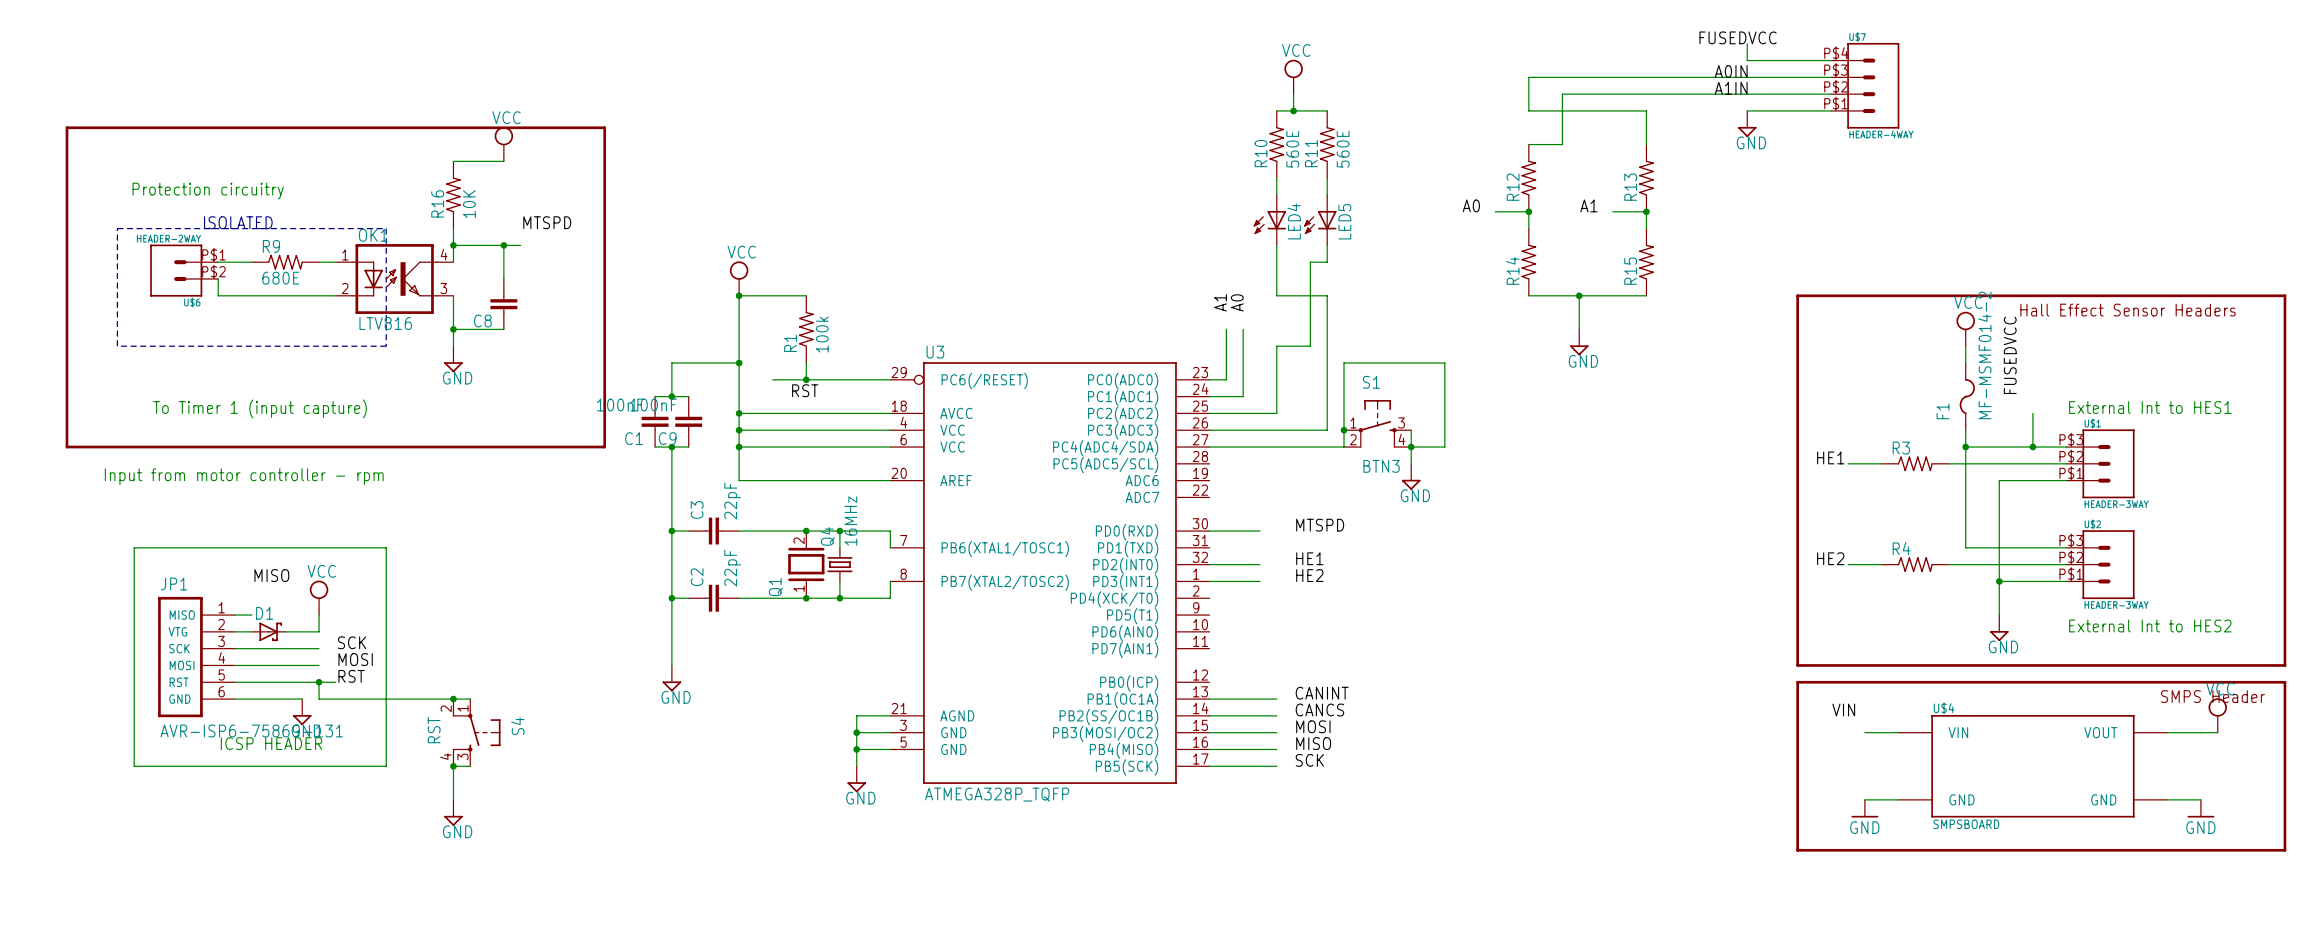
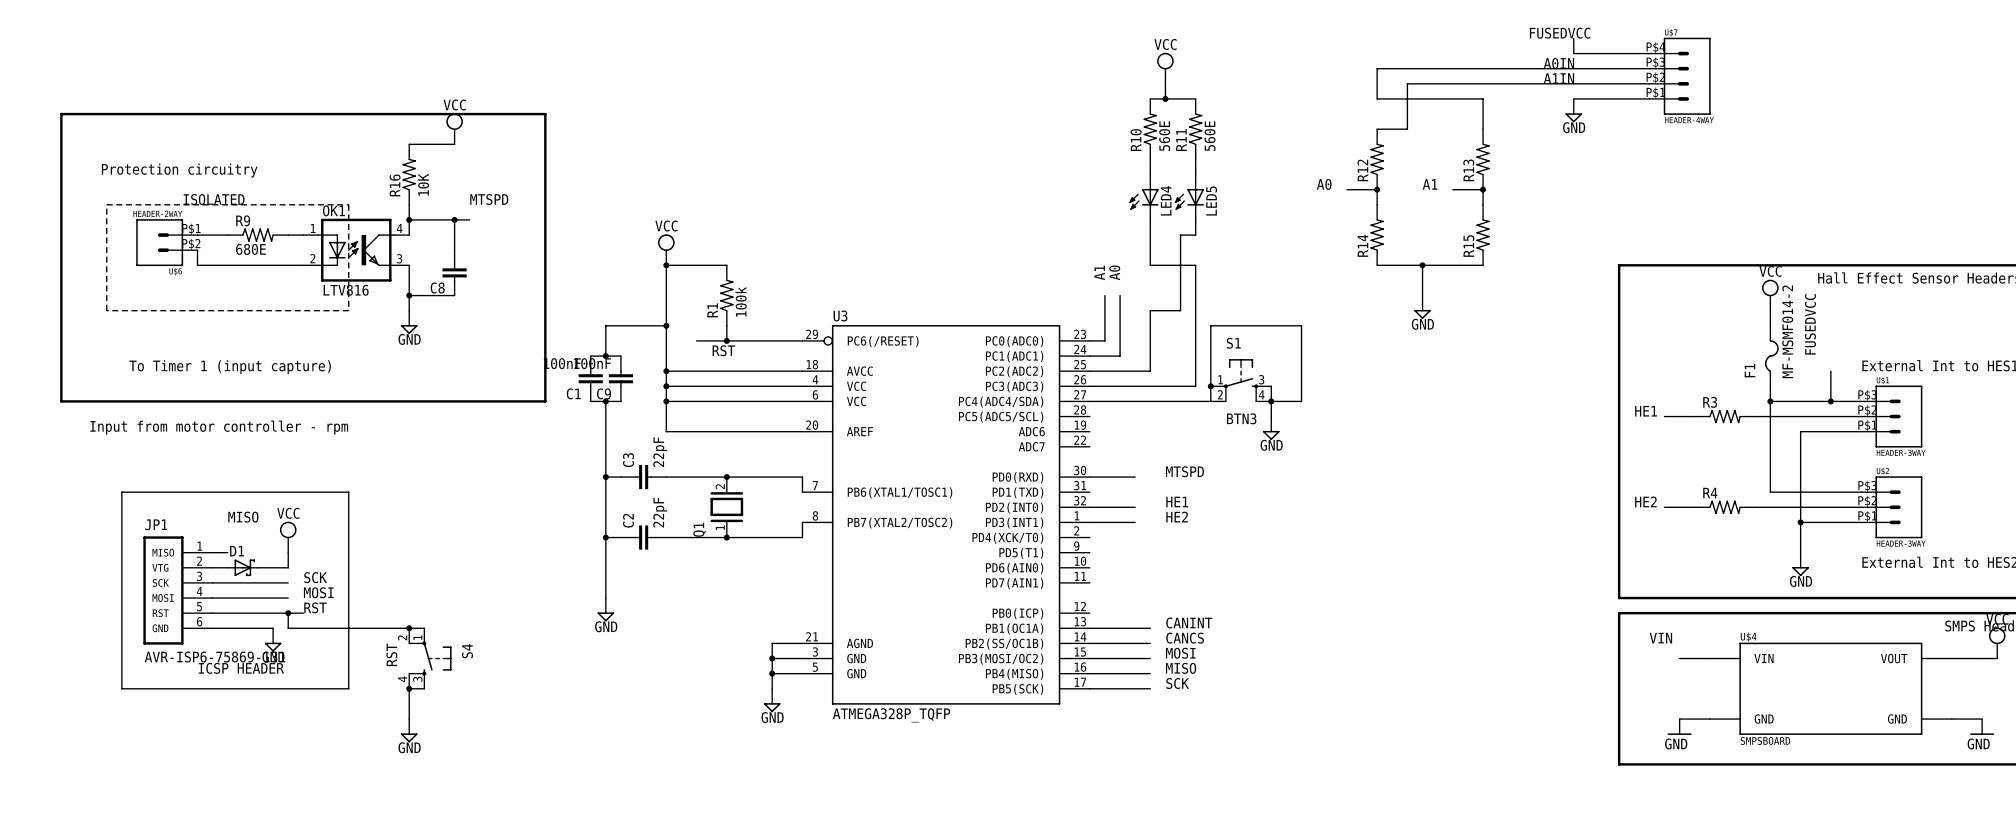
wire: (839, 531) (839, 547) -> none
junction: (839, 531) -> none
Q4: 16MHz (839, 564) -> none
wire: (839, 581) (839, 598) -> none
junction: (839, 598) -> none

